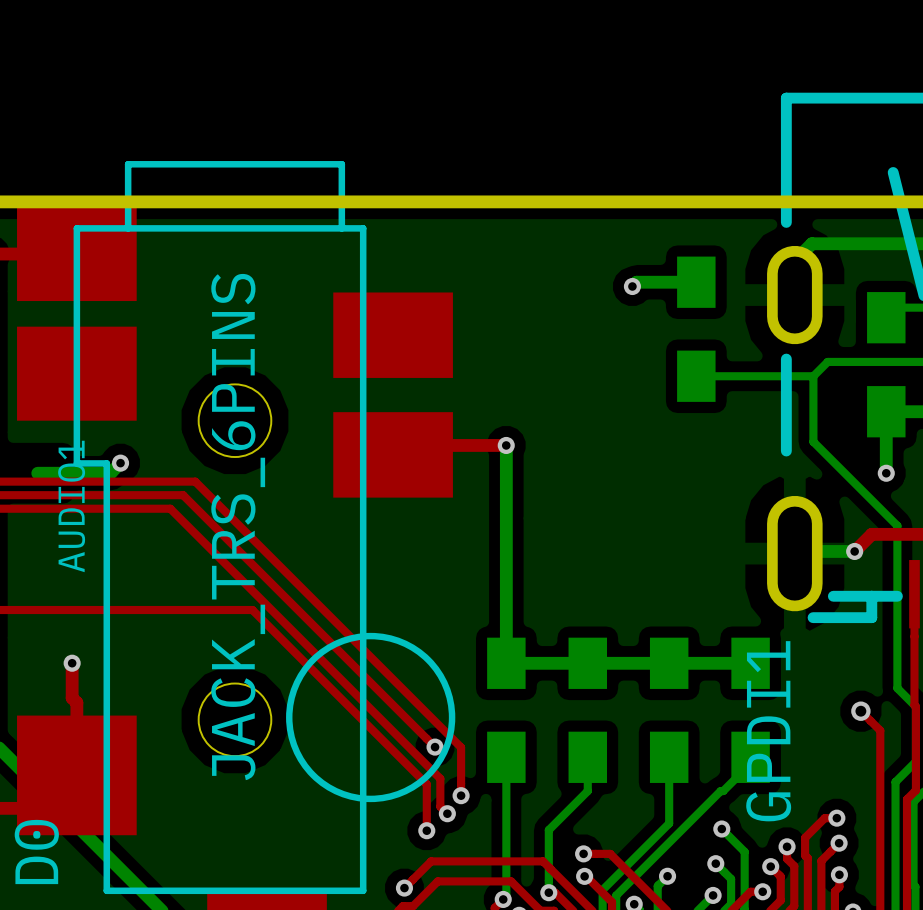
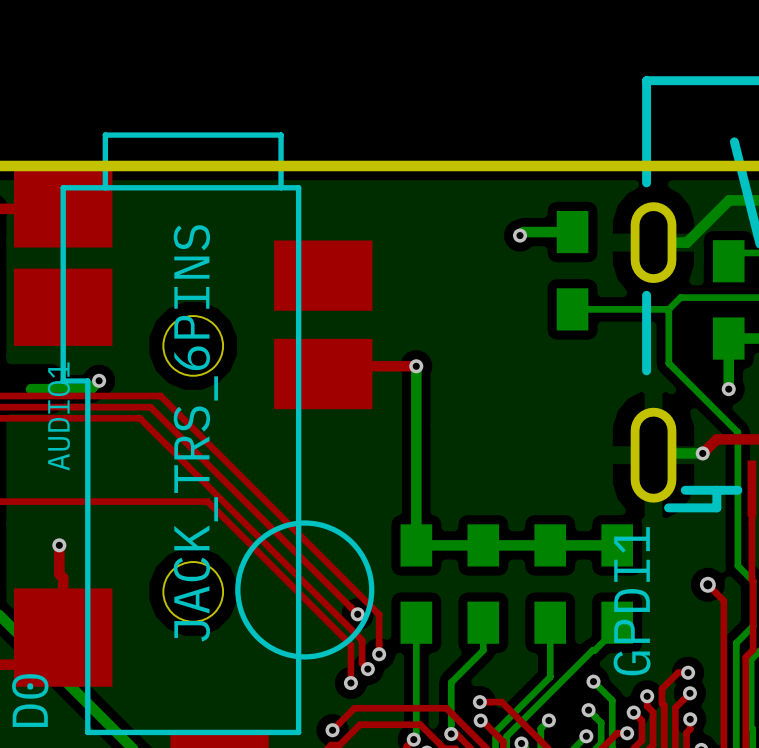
bottom track: (886, 243) (811, 243) (794, 260) (794, 269) -> (729, 200) (686, 242) (653, 242)

